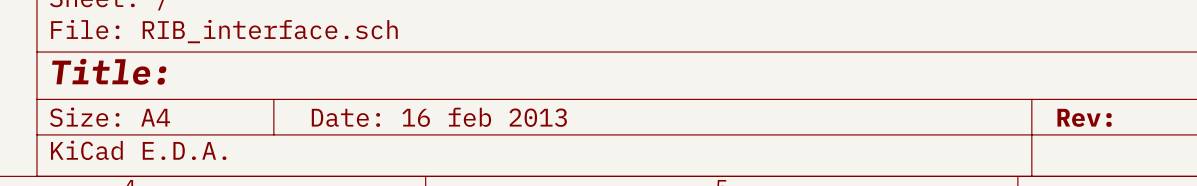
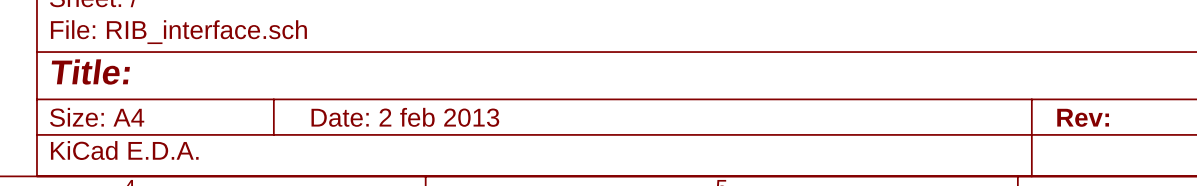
title block: Date: 16 feb 2013 (439, 117) -> Date: 2 feb 2013 (405, 117)

